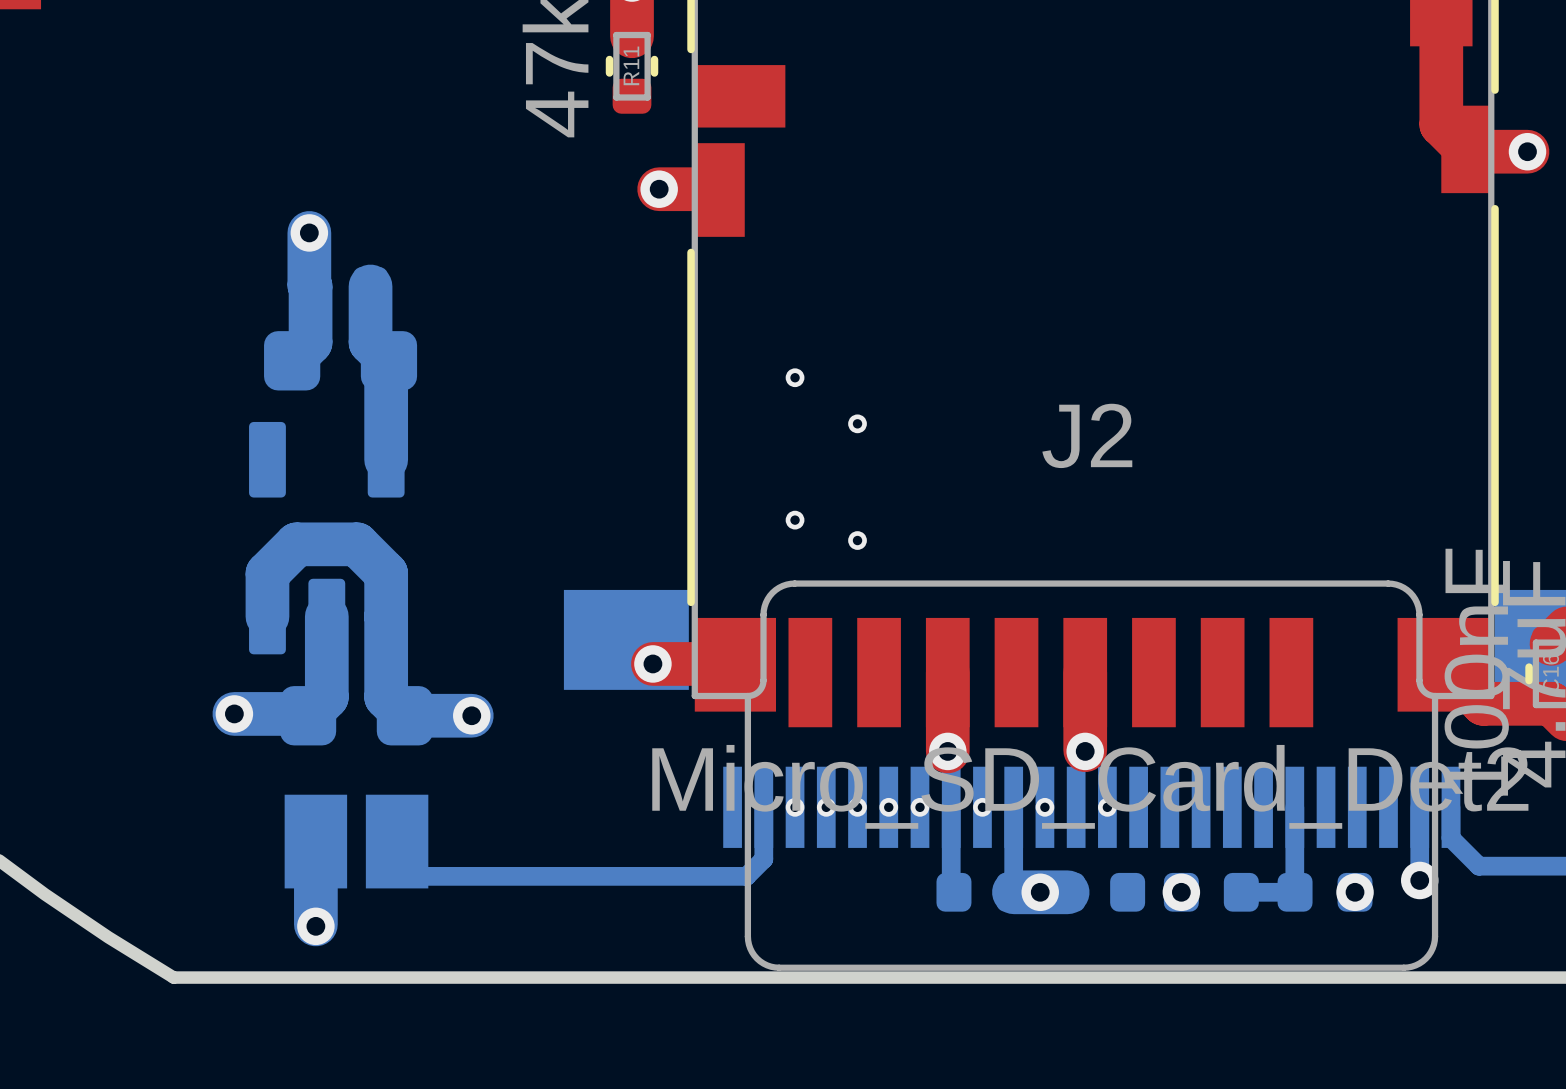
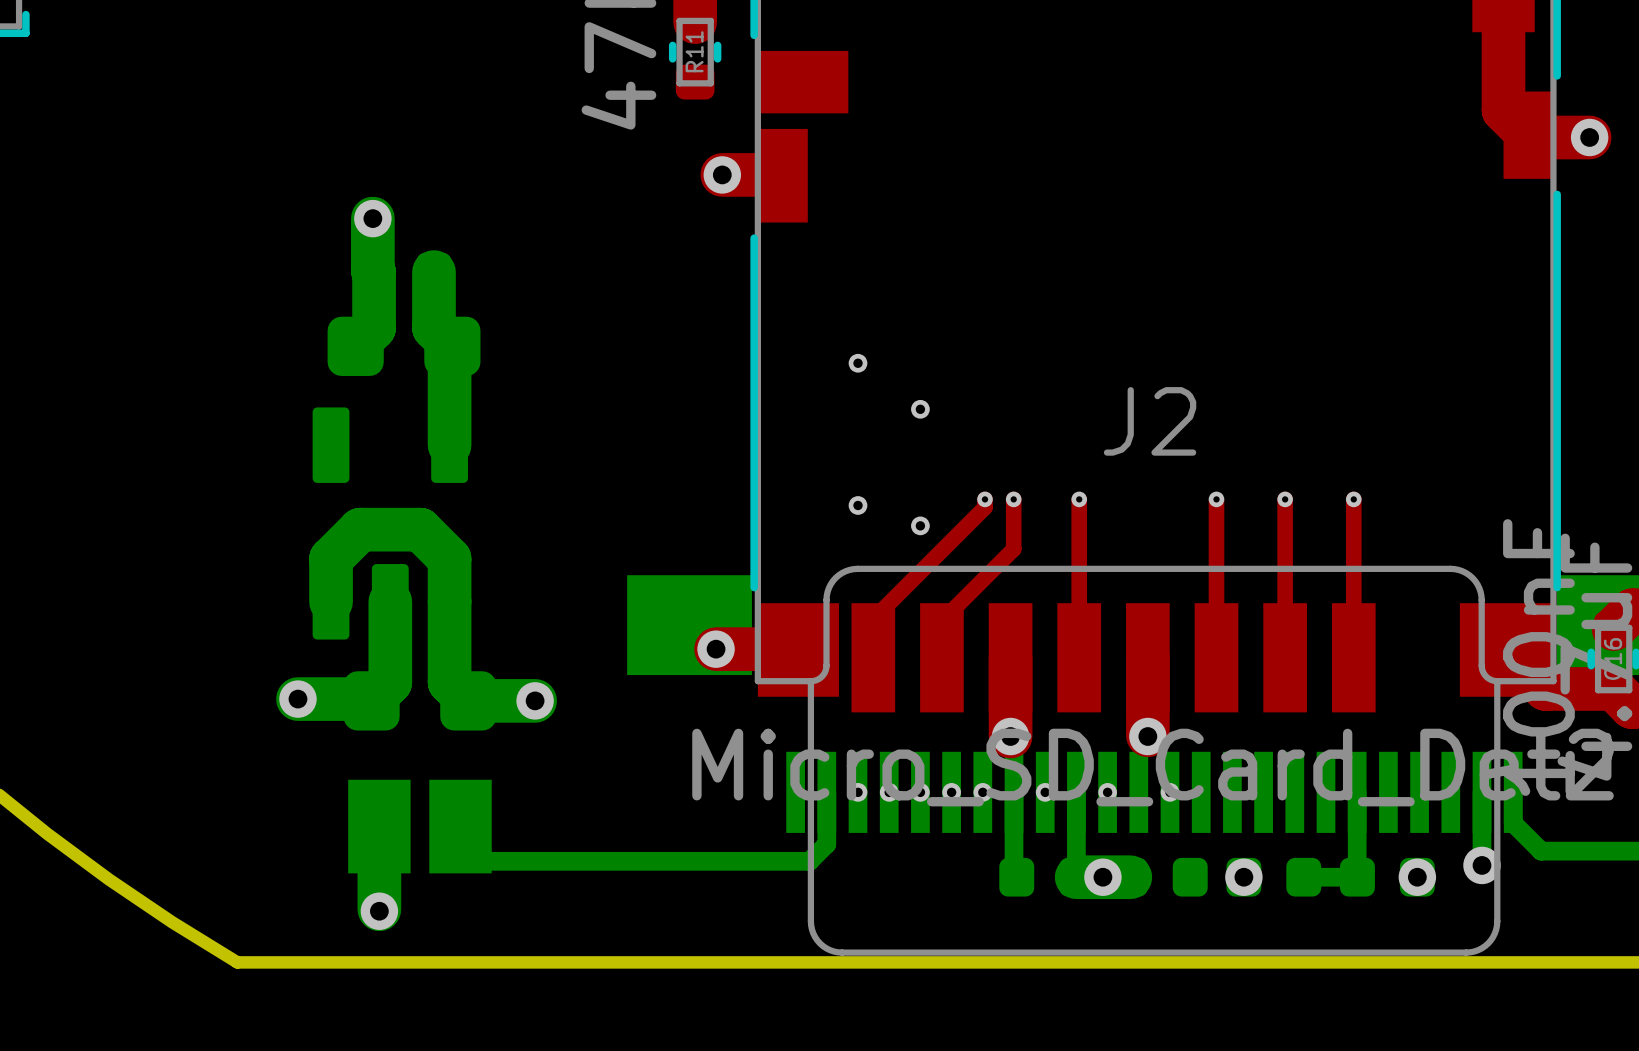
top track: none -> (985, 499) (985, 507) (873, 619) (873, 657)
via: none -> (985, 499)
top track: none -> (1013, 499) (1013, 549) (941, 620) (941, 657)
via: none -> (1013, 499)
top track: none -> (1079, 500) (1079, 657)
via: none -> (1079, 499)
via: none -> (1216, 499)
top track: none -> (1285, 499) (1285, 657)
via: none -> (1285, 499)
top track: none -> (1353, 499) (1353, 657)
via: none -> (1353, 499)
top track: none -> (1216, 501) (1216, 657)

